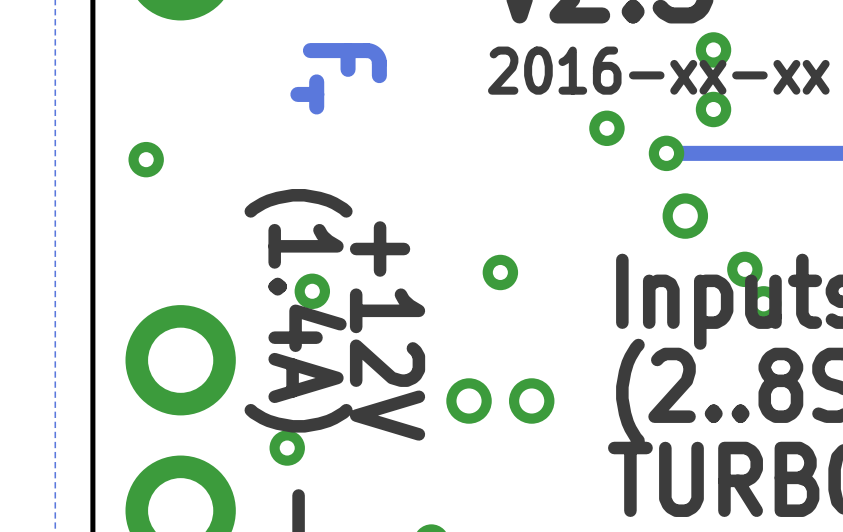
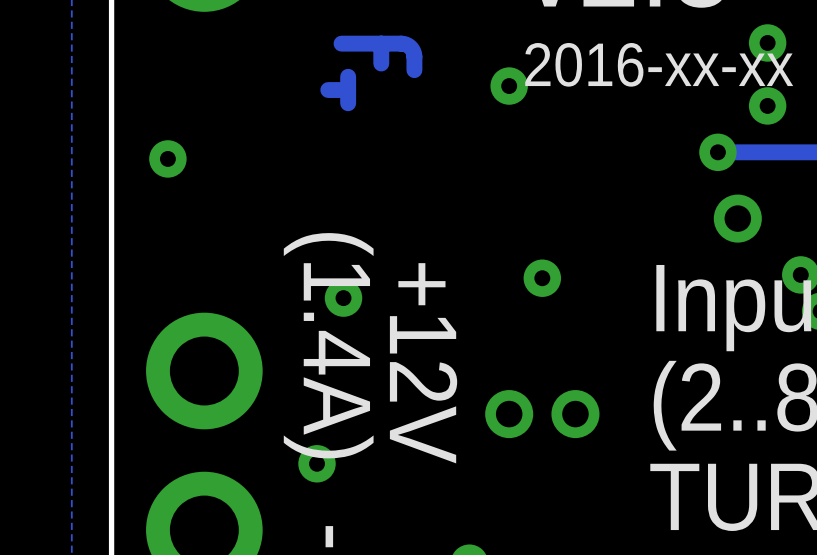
via position: (606, 128) -> (509, 86)

